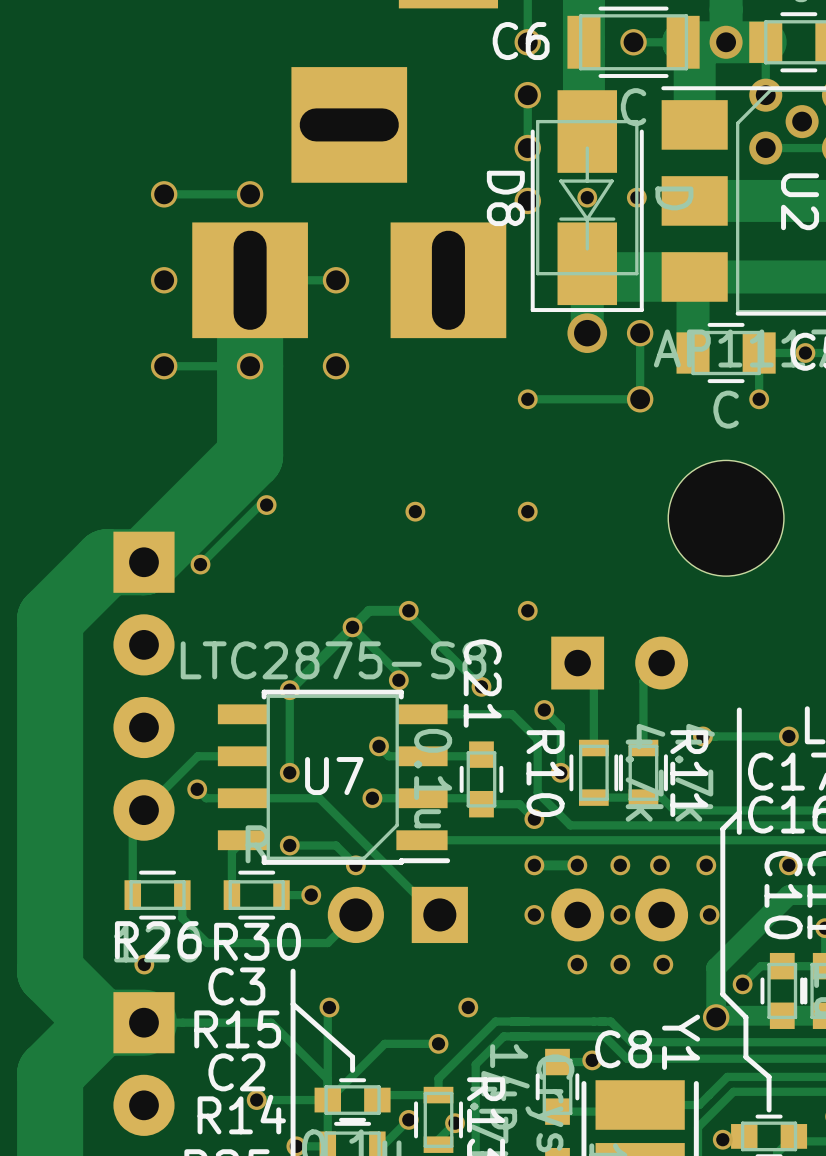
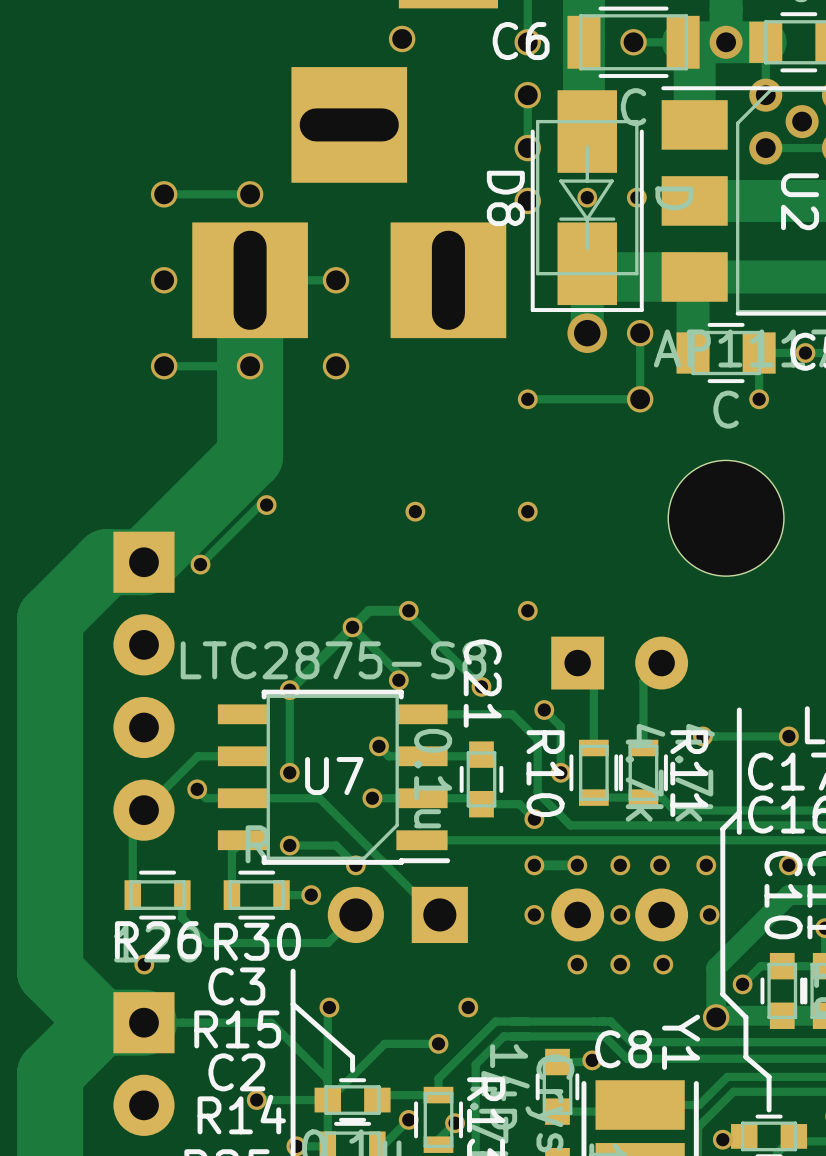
via: none -> (402, 38)

